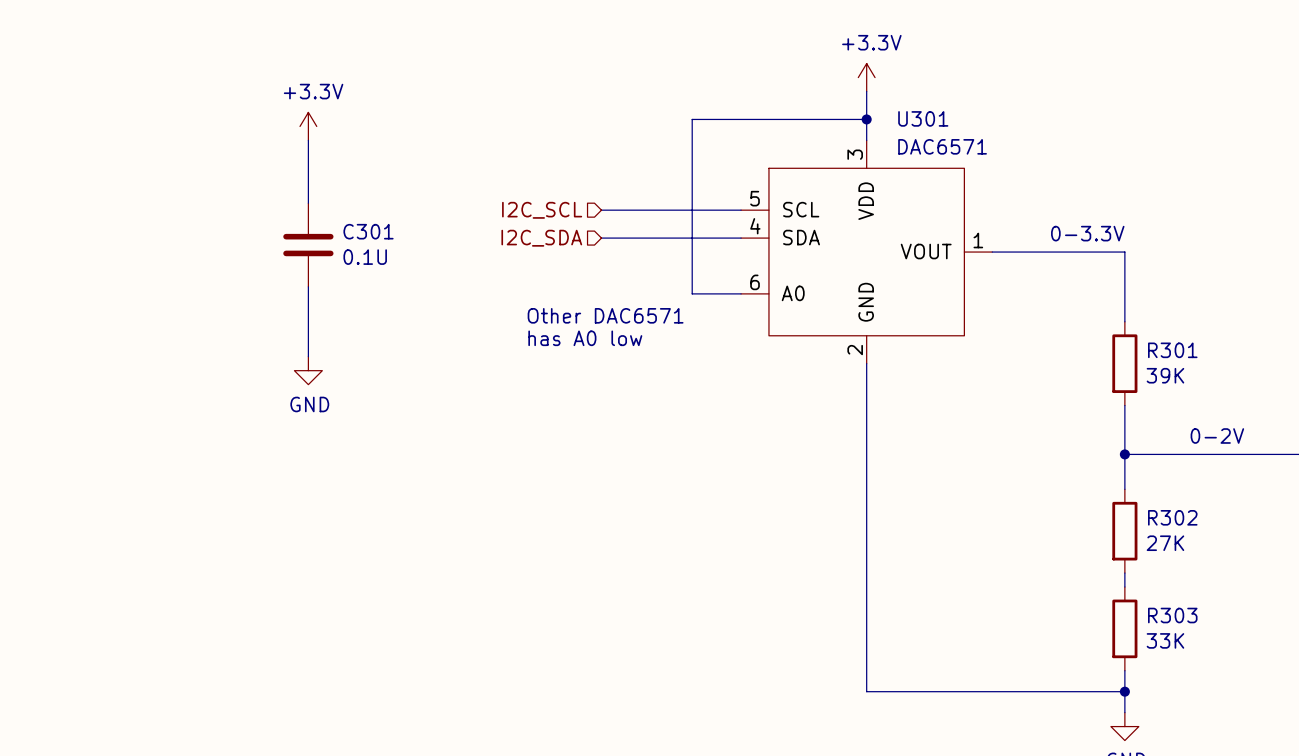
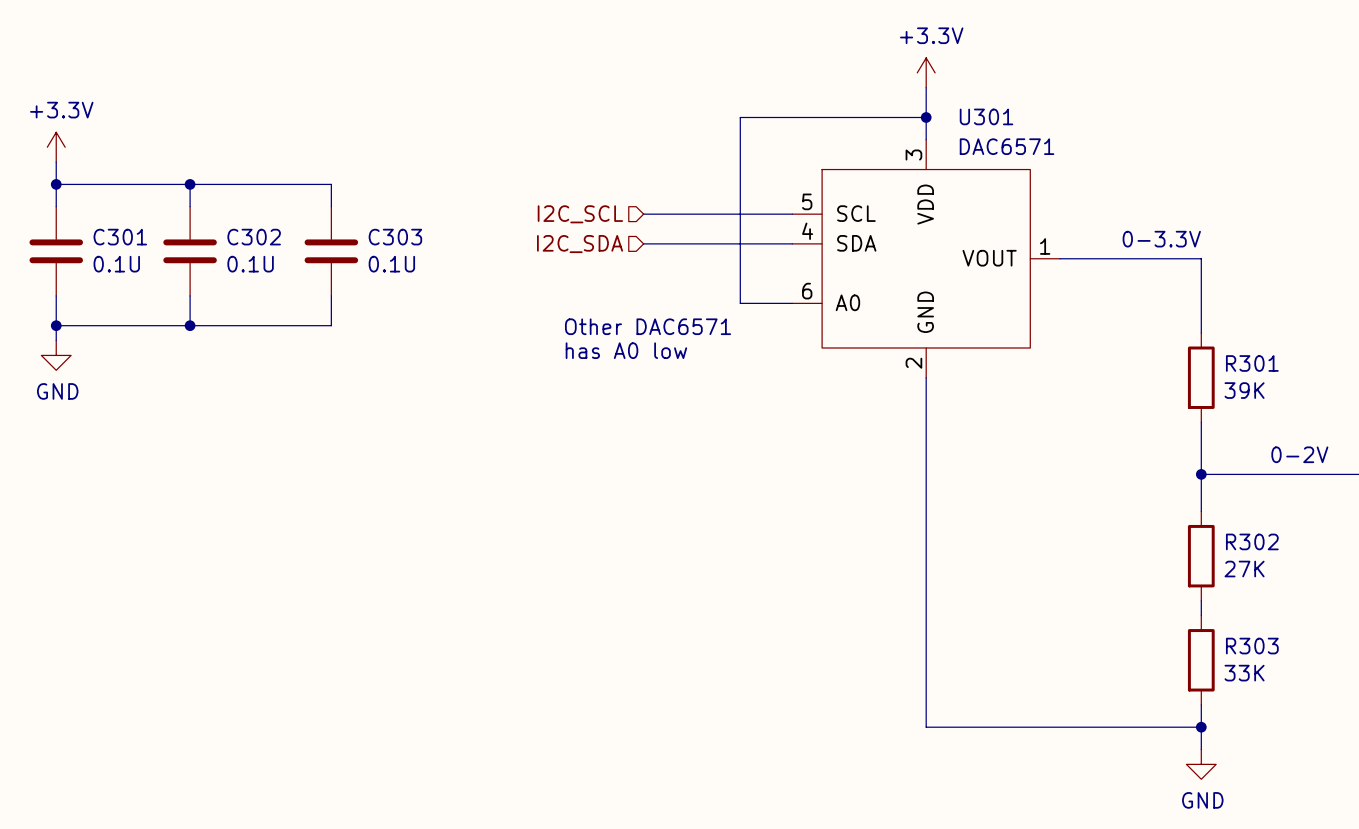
power symbol position: +3.3V (308, 126) -> +3.3V (56, 147)
wire: (308, 140) (308, 182) -> (56, 184) (331, 184)
wire: none -> (56, 162) (56, 206)
junction: none -> (56, 184)
wire: none -> (190, 184) (190, 206)
junction: none -> (190, 184)
C301 name: C301 (368, 231) -> C303 (395, 237)
C301: none -> 0.1U (56, 251)
C302: none -> 0.1U (190, 251)
wire: none -> (56, 295) (56, 340)
wire: none -> (190, 295) (190, 325)
junction: none -> (56, 325)
junction: none -> (190, 325)
wire: (308, 314) (308, 356) -> (331, 325) (56, 325)
power symbol position: GND (308, 370) -> GND (56, 355)

